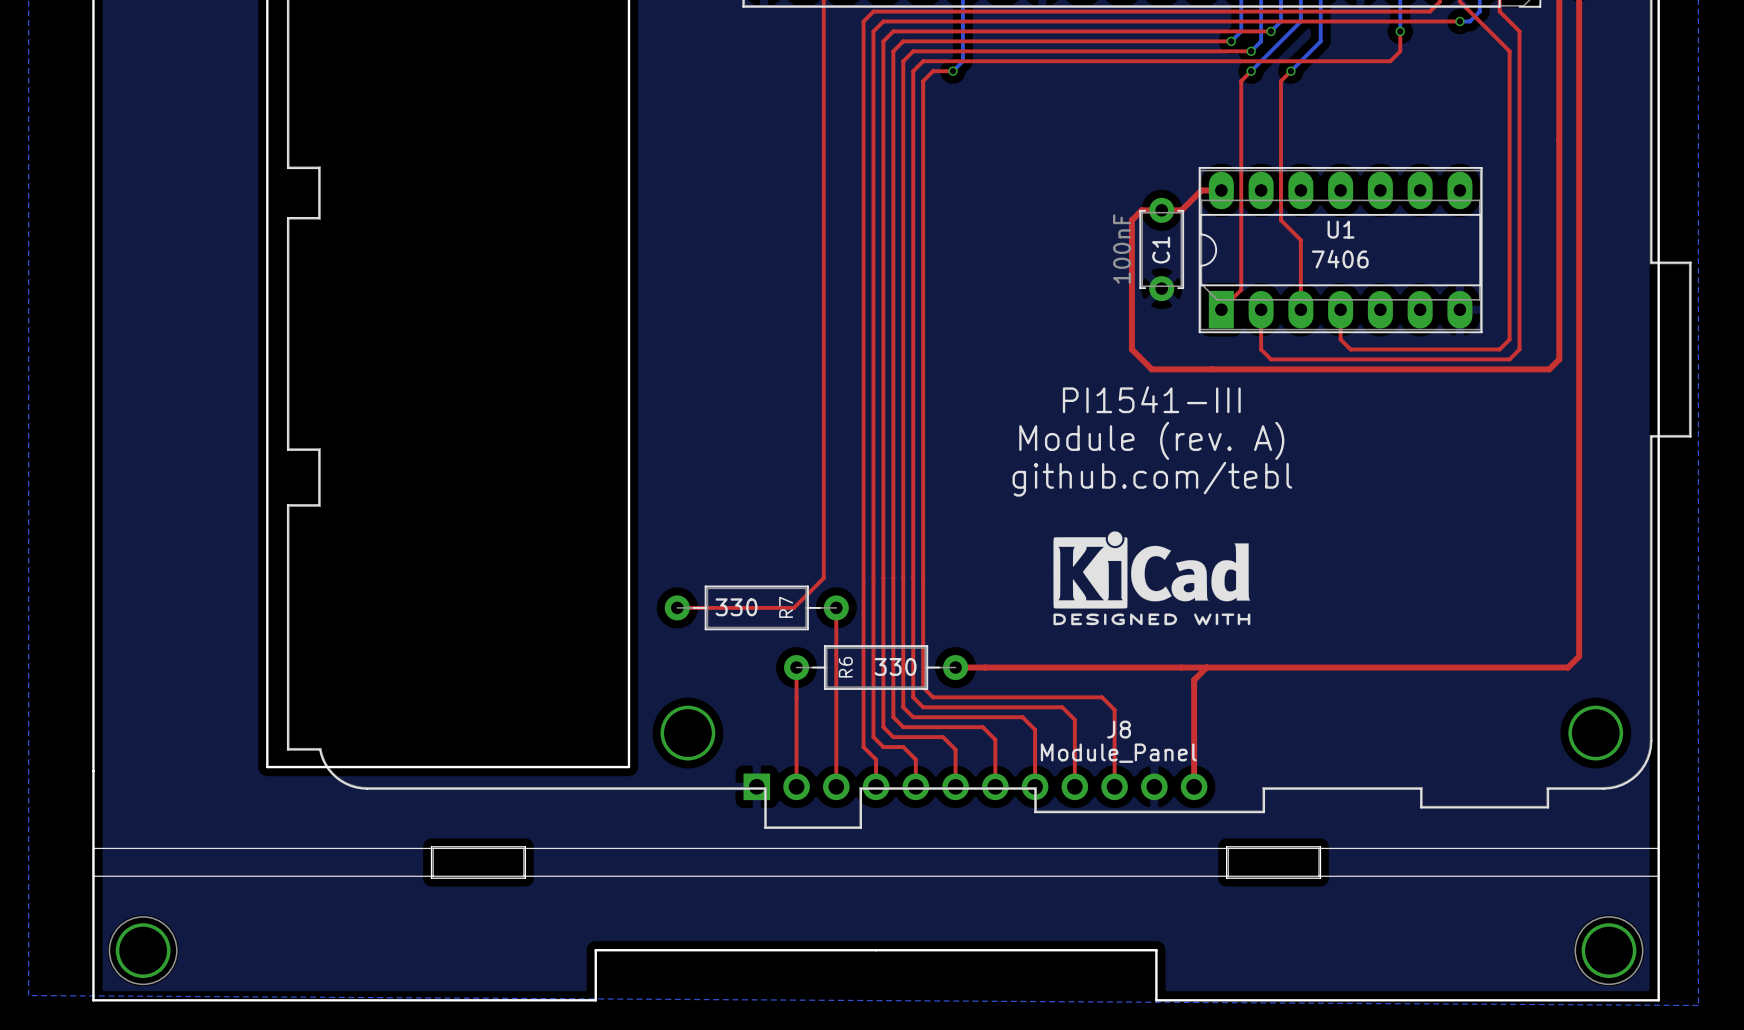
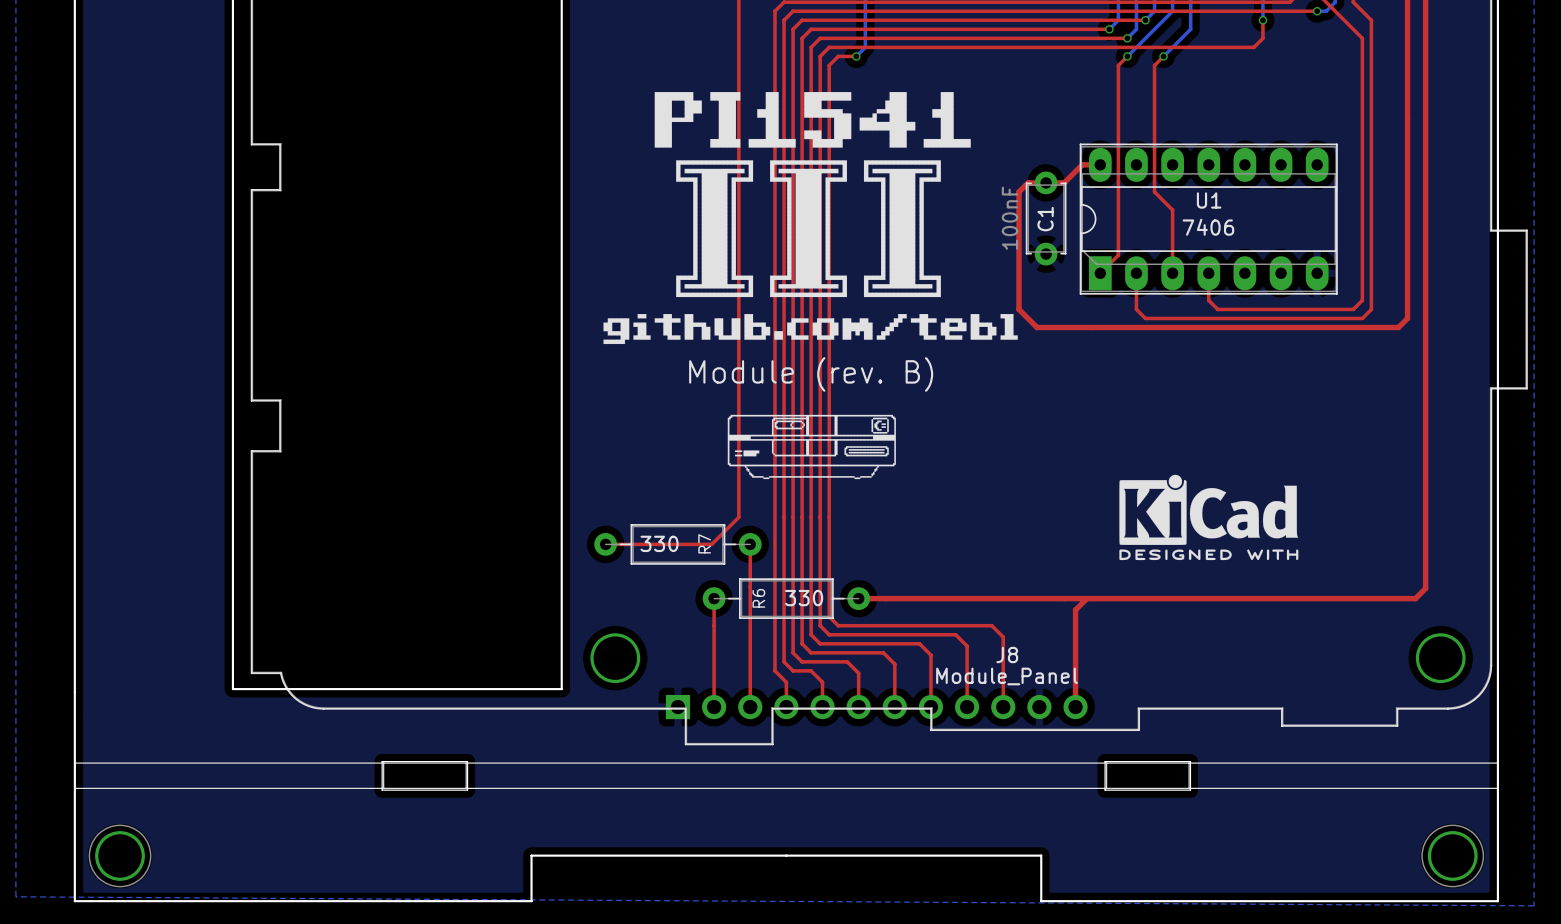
drawing: none -> [603, 92, 1018, 345]
text: PI1541-III (1151, 399) -> none
text: Module (rev. A) (1151, 440) -> Module (rev. B) (811, 374)
drawing: none -> [727, 414, 896, 480]
text: github.com/tebl (1152, 479) -> none
drawing position: (1151, 578) -> (1208, 517)

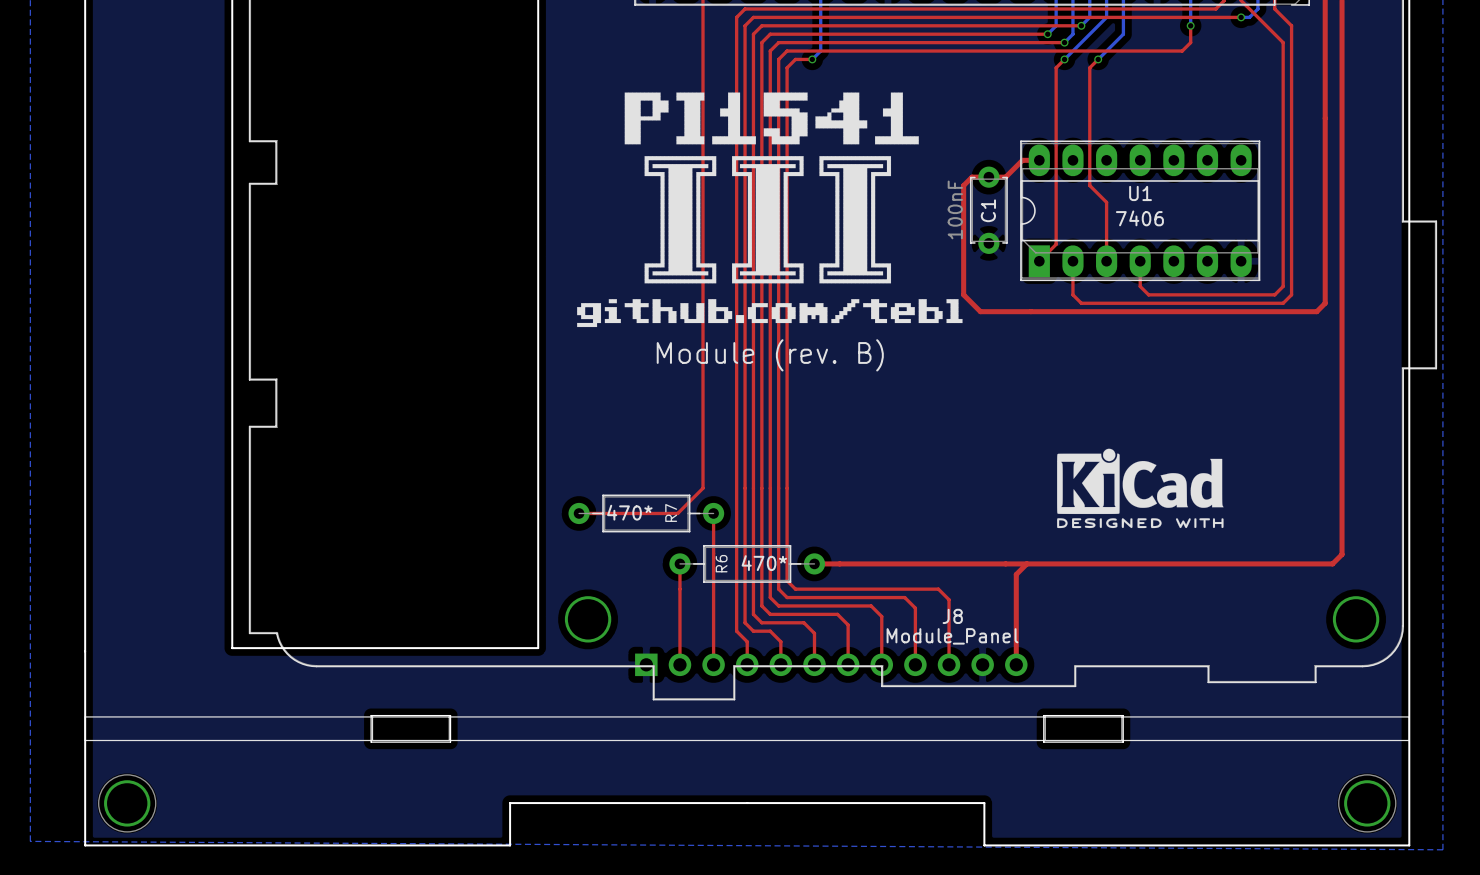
drawing: [727, 414, 896, 480] -> none
R7 value: 330 (659, 543) -> 470* (629, 512)
R6 value: 330 (804, 598) -> 470* (764, 563)

